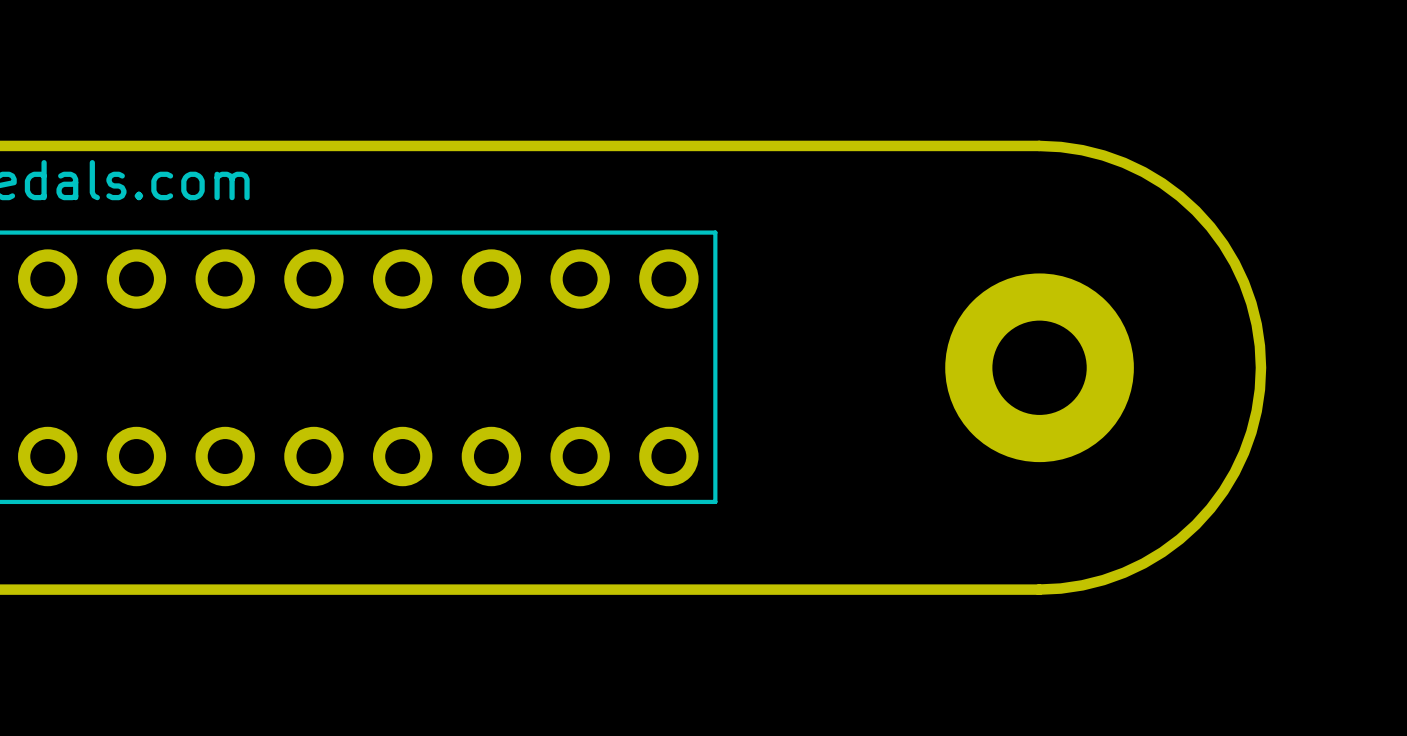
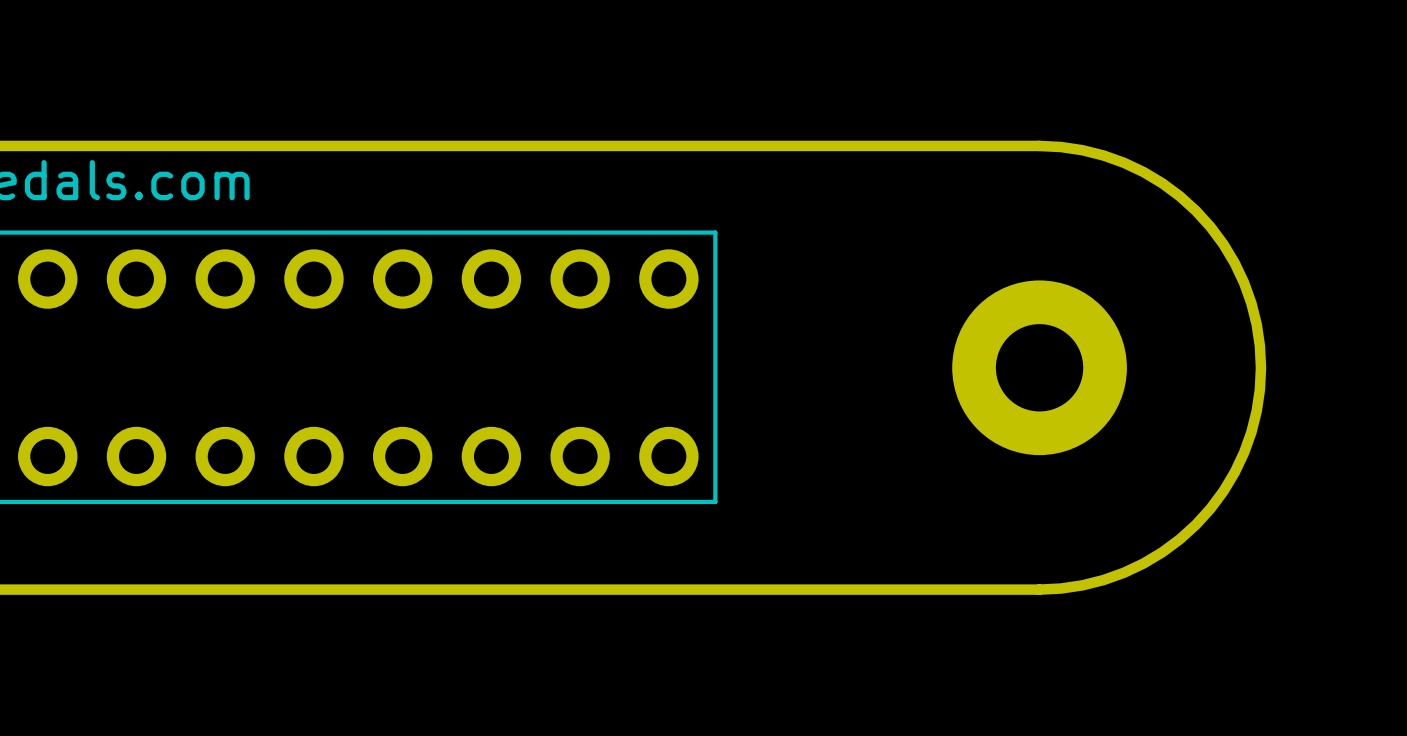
part footprint: [945, 273, 1134, 463] -> [952, 280, 1127, 456]

